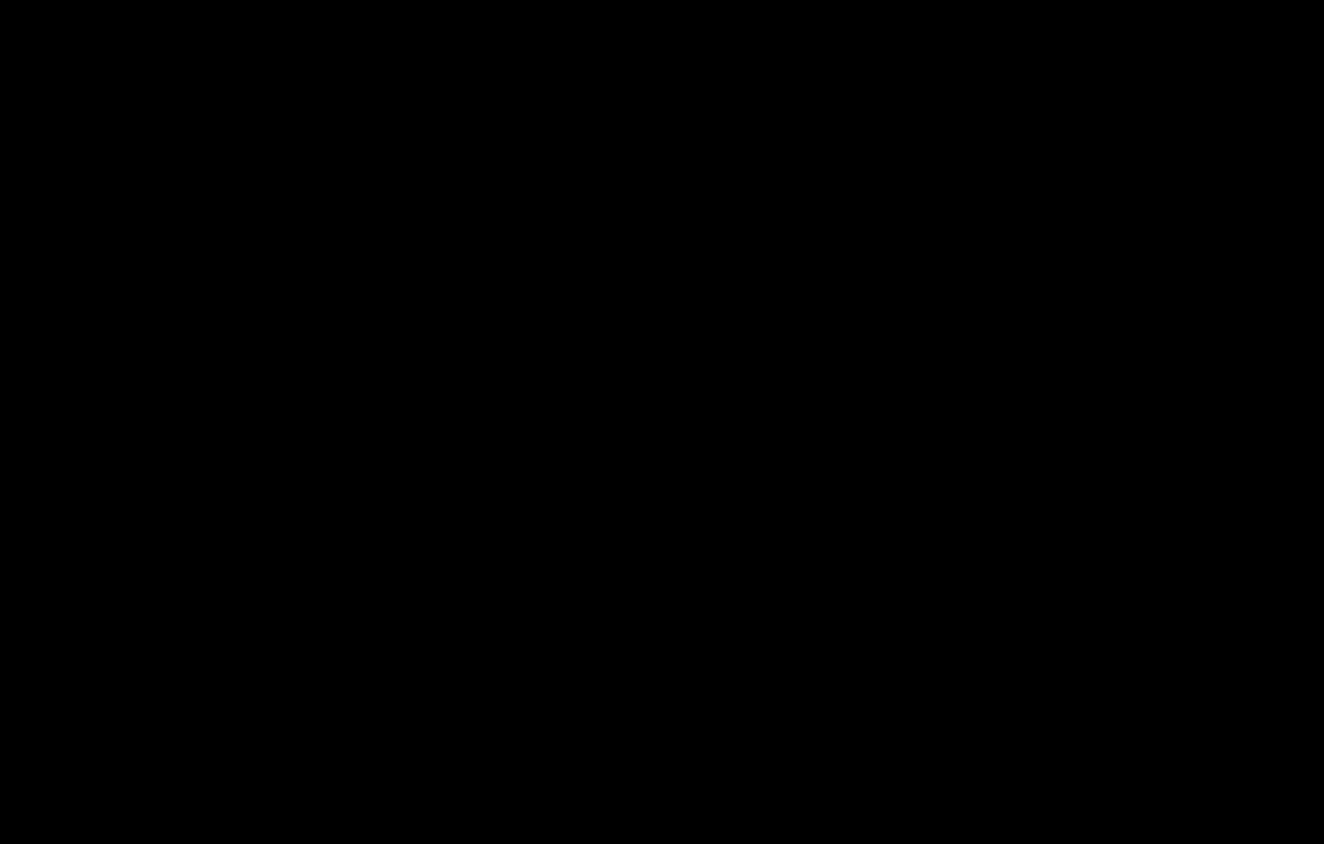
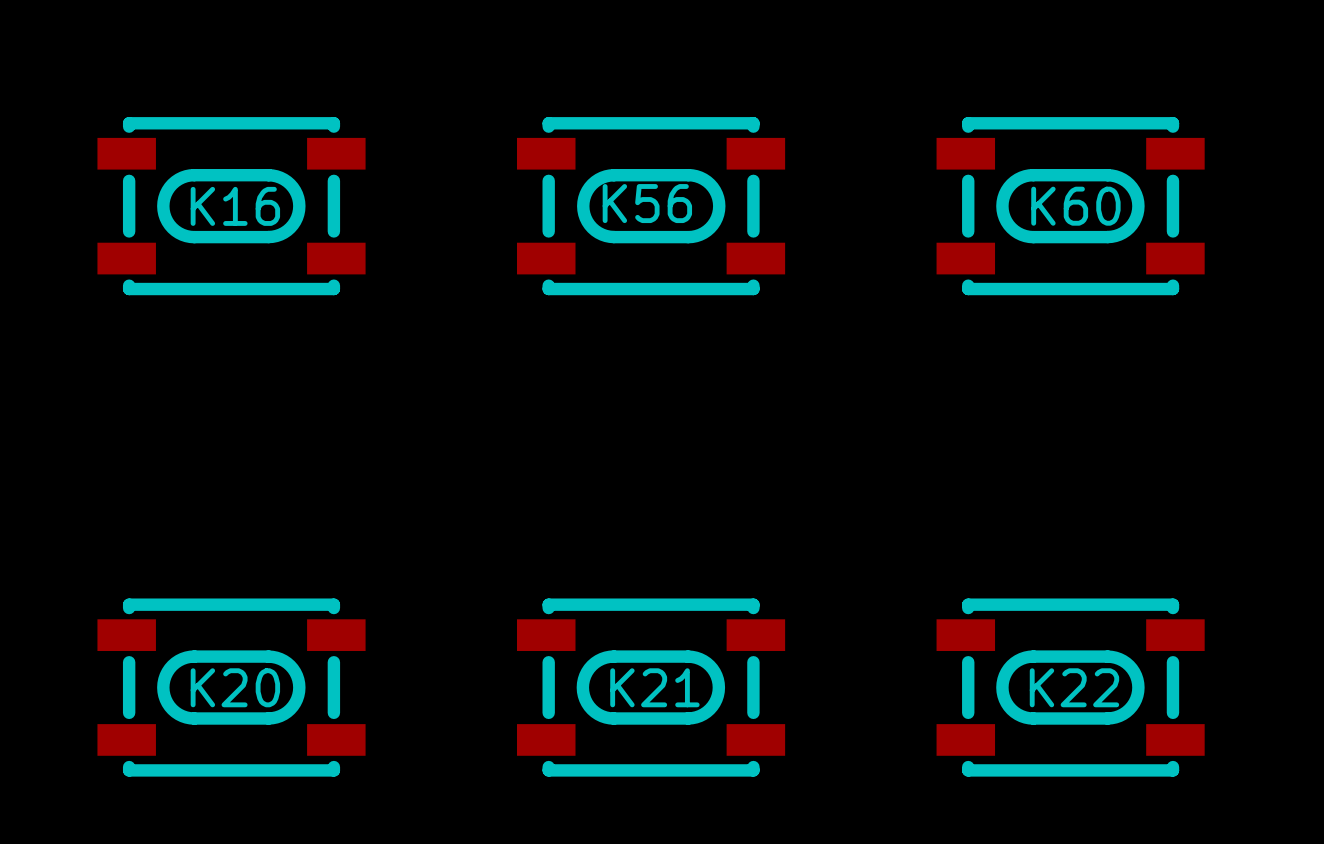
K16: none -> (231, 206)
K56: none -> (651, 206)
K60: none -> (1070, 206)
K20: none -> (231, 687)
K21: none -> (651, 687)
K22: none -> (1070, 687)

